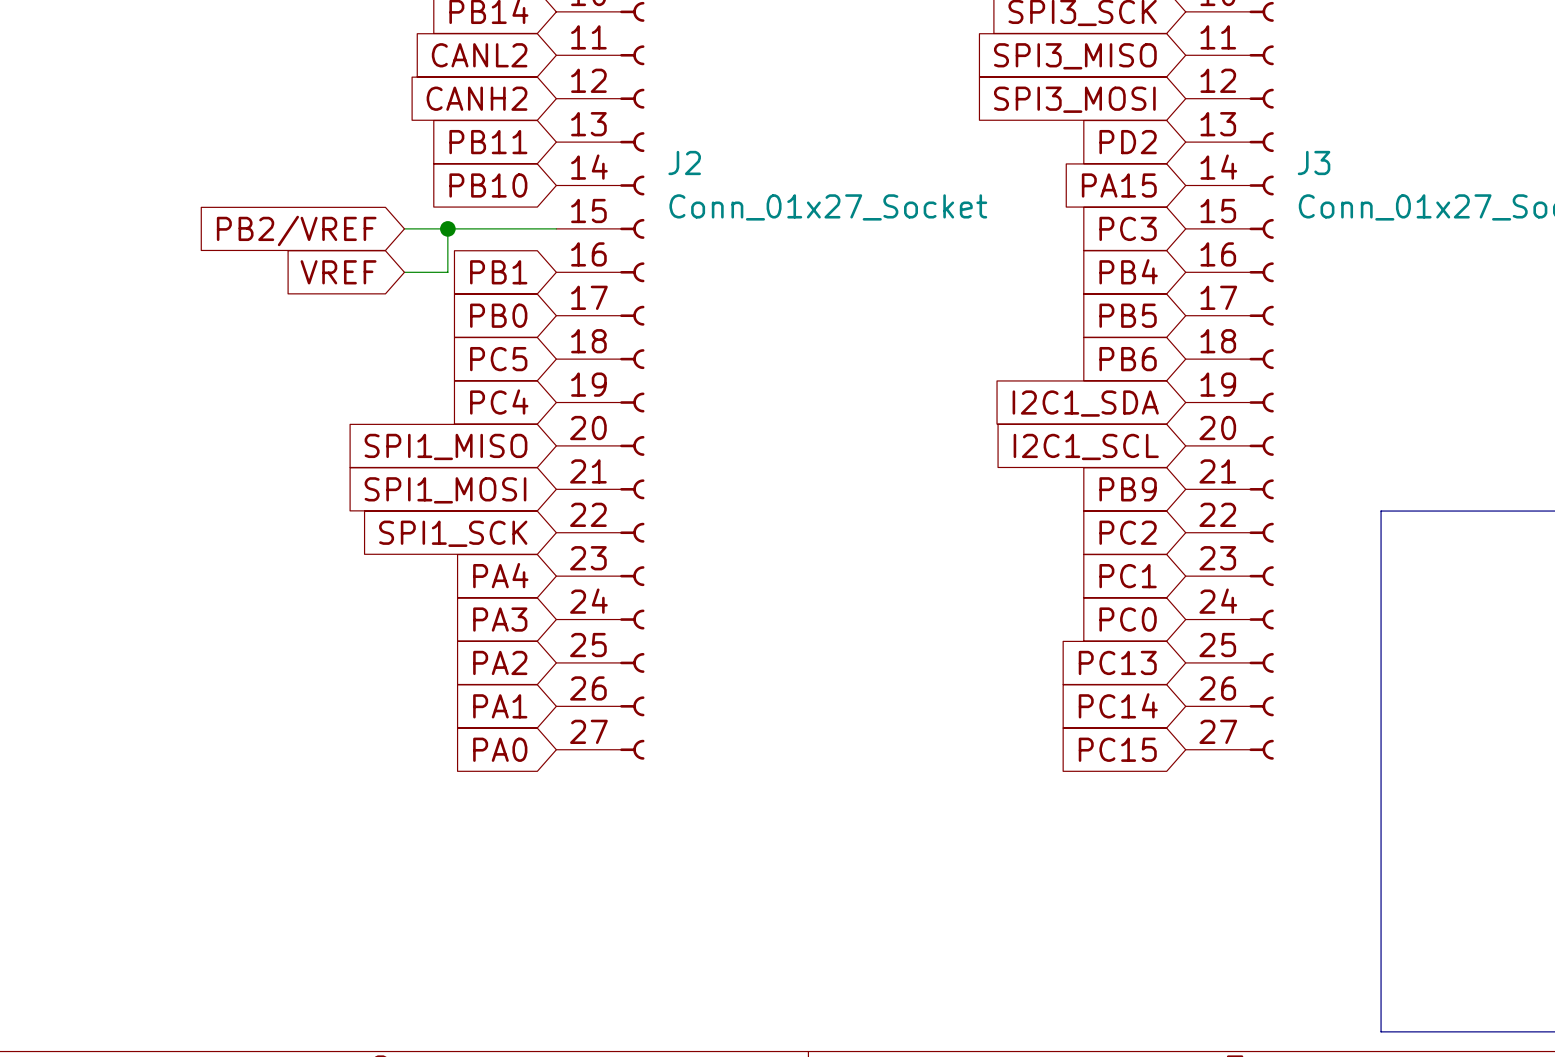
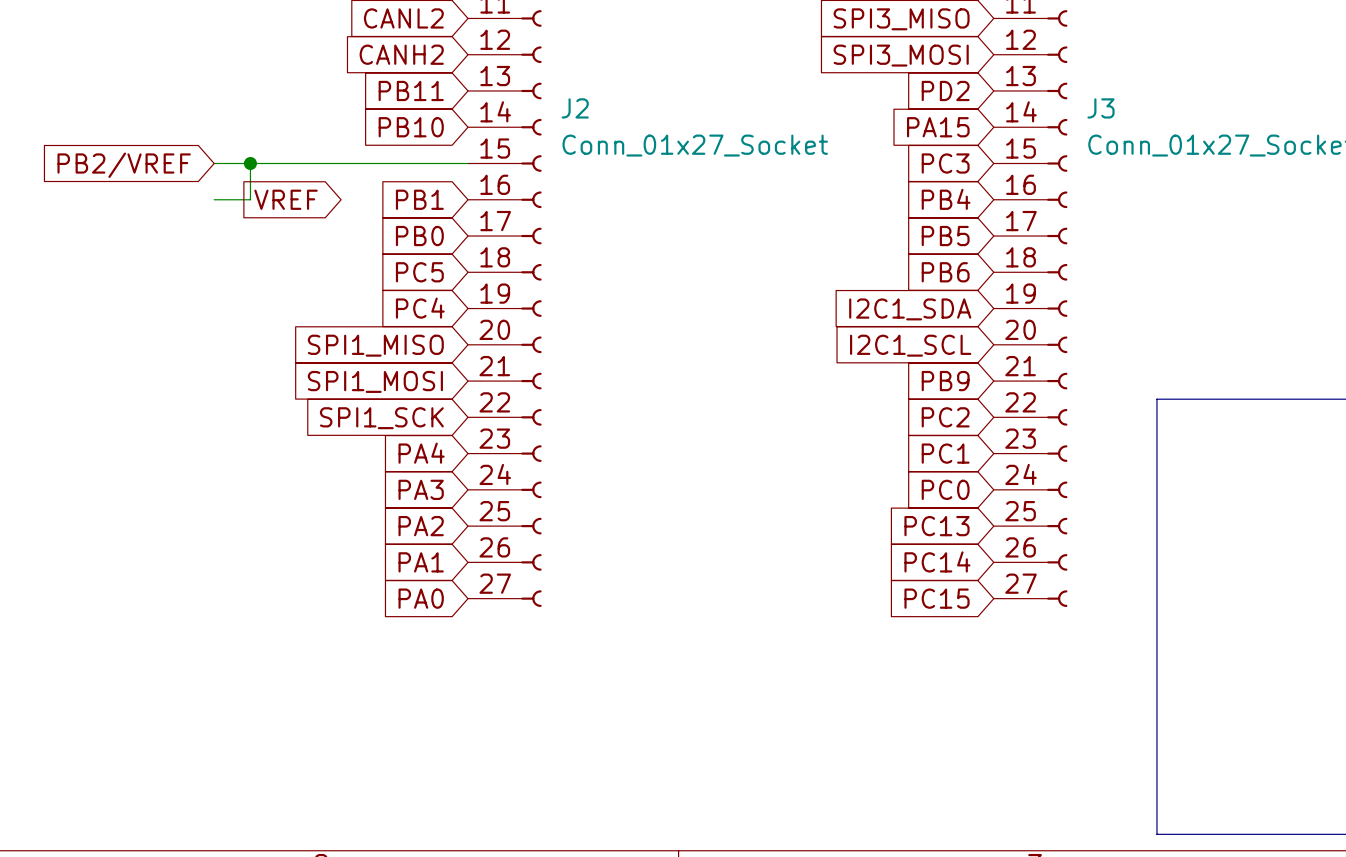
wire: none -> (214, 163) (341, 163)
junction: none -> (250, 163)
wire: (447, 228) (447, 272) (404, 272) -> (250, 163) (250, 199) (214, 199)
junction: (447, 228) -> none
global label position: PB2/VREF (296, 230) -> PB2/VREF (124, 165)

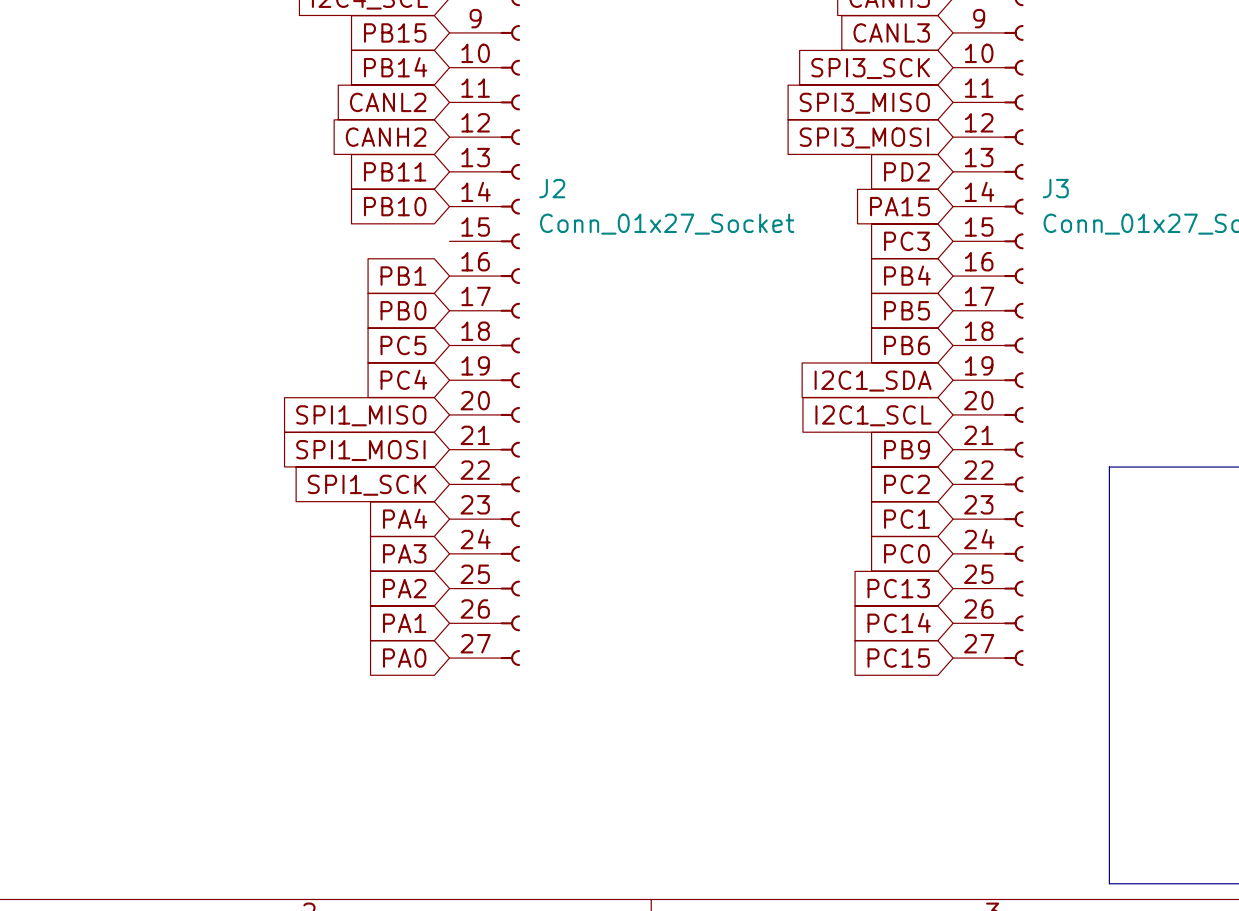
wire: (214, 163) (468, 163) -> none
wire: (250, 163) (250, 199) (214, 199) -> none
junction: (250, 163) -> none
global label: PB2/VREF (124, 165) -> none
global label: VREF (286, 199) -> none

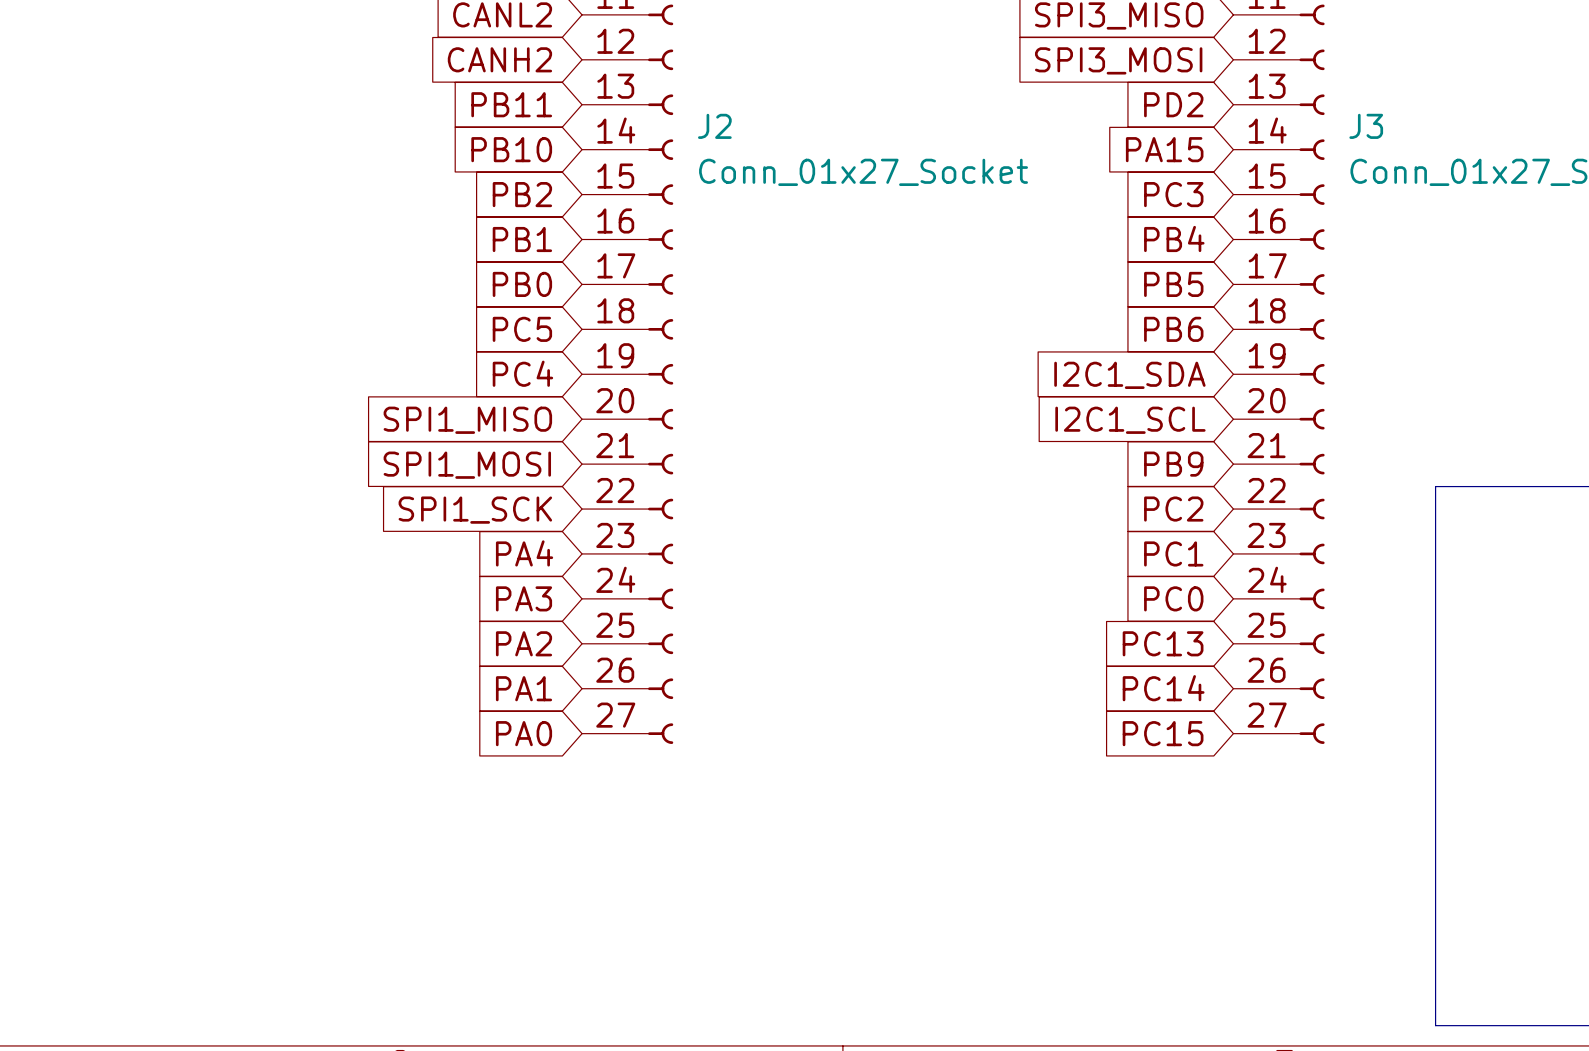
global label: none -> PB2 (522, 194)

